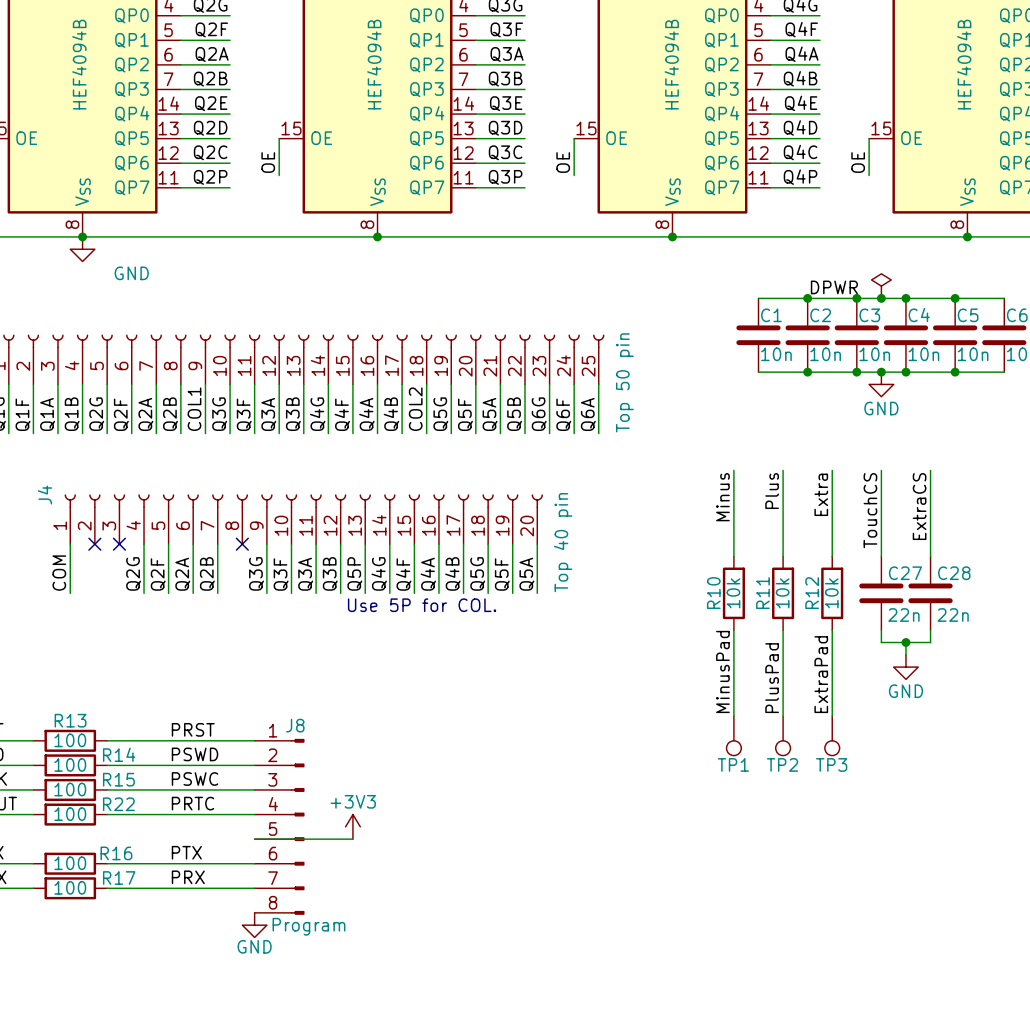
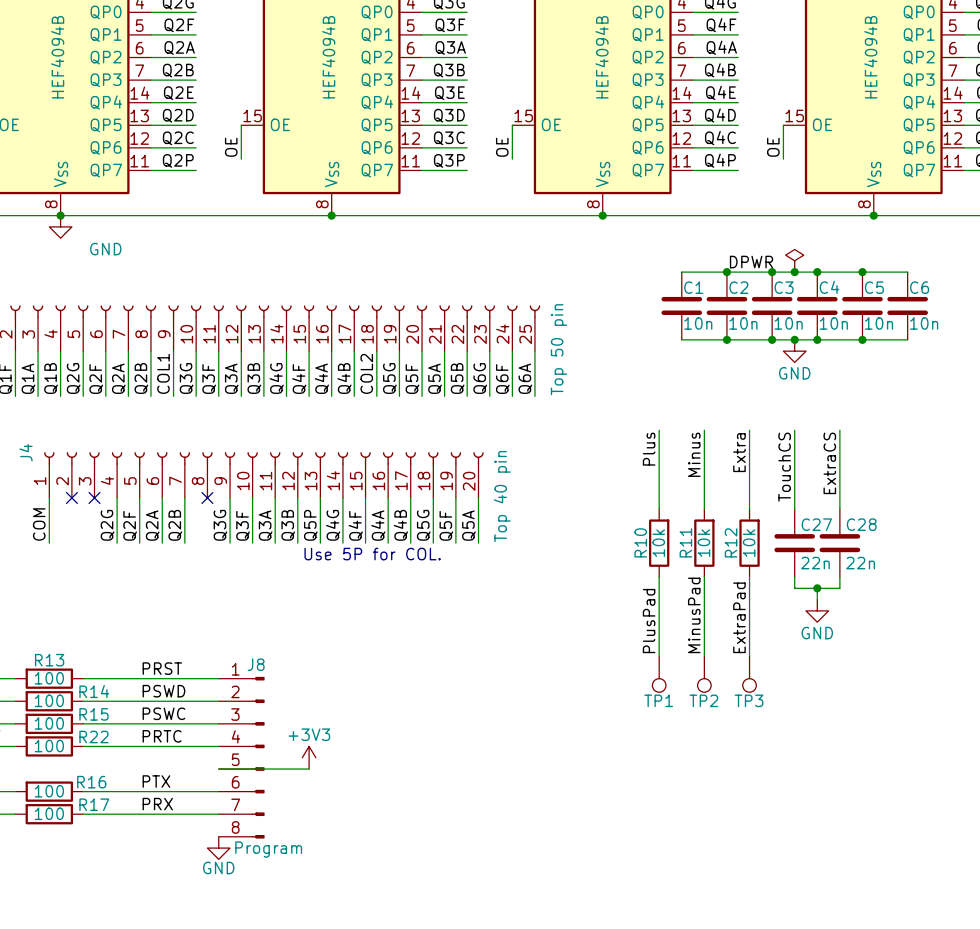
label: Plus (772, 491) -> Minus (694, 454)
label: Minus (722, 497) -> Plus (649, 449)
label: MinusPad (722, 671) -> PlusPad (649, 621)
label: PlusPad (772, 678) -> MinusPad (694, 615)

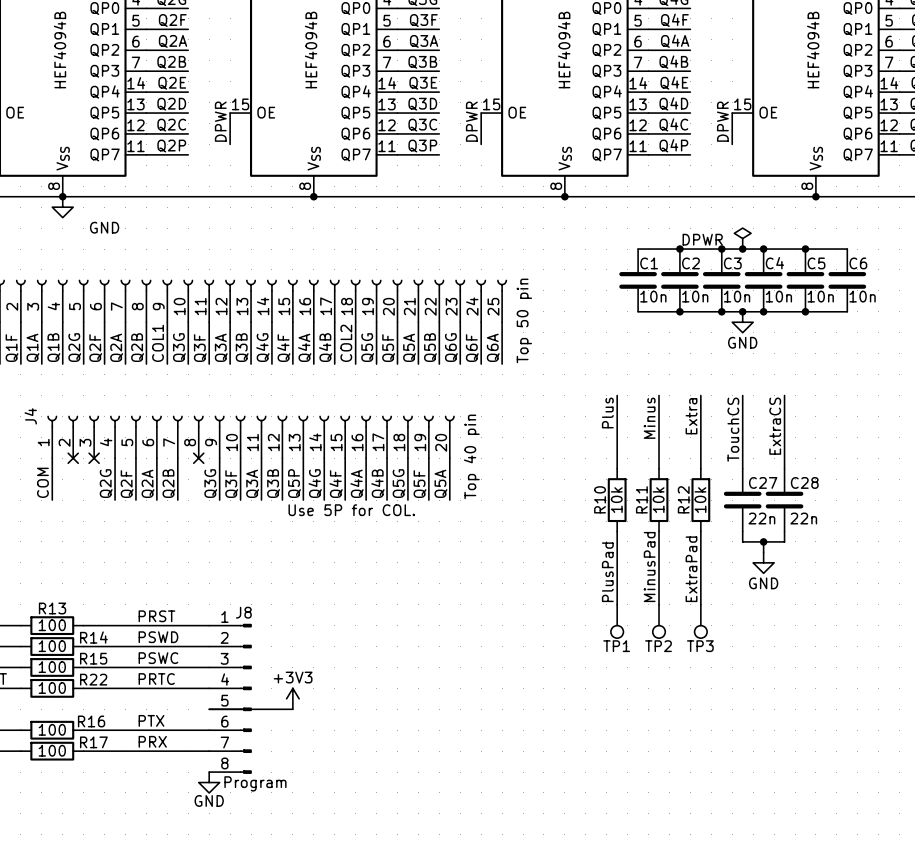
label: OE (231, 147) -> DPWR (220, 121)
label: OE (502, 147) -> DPWR (471, 121)
label: OE (773, 147) -> DPWR (722, 121)

